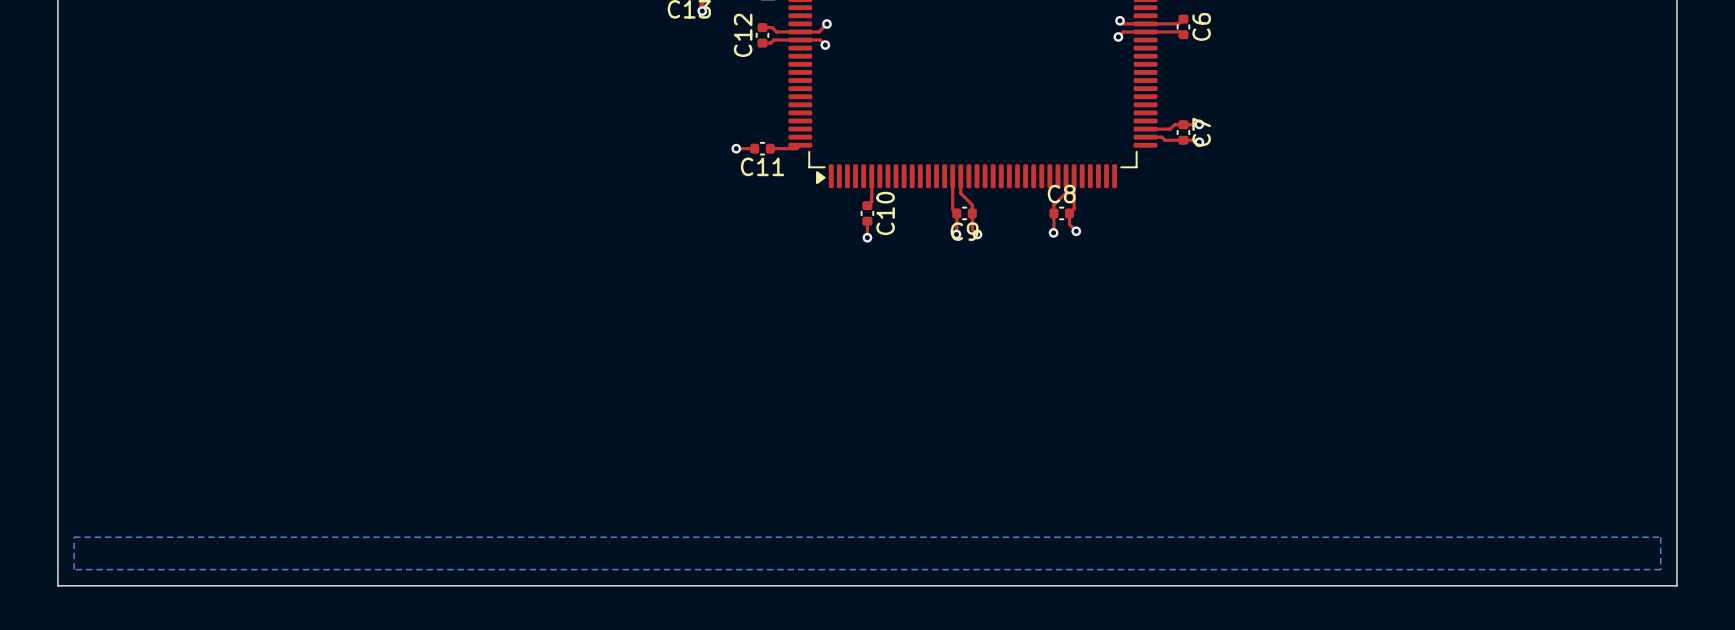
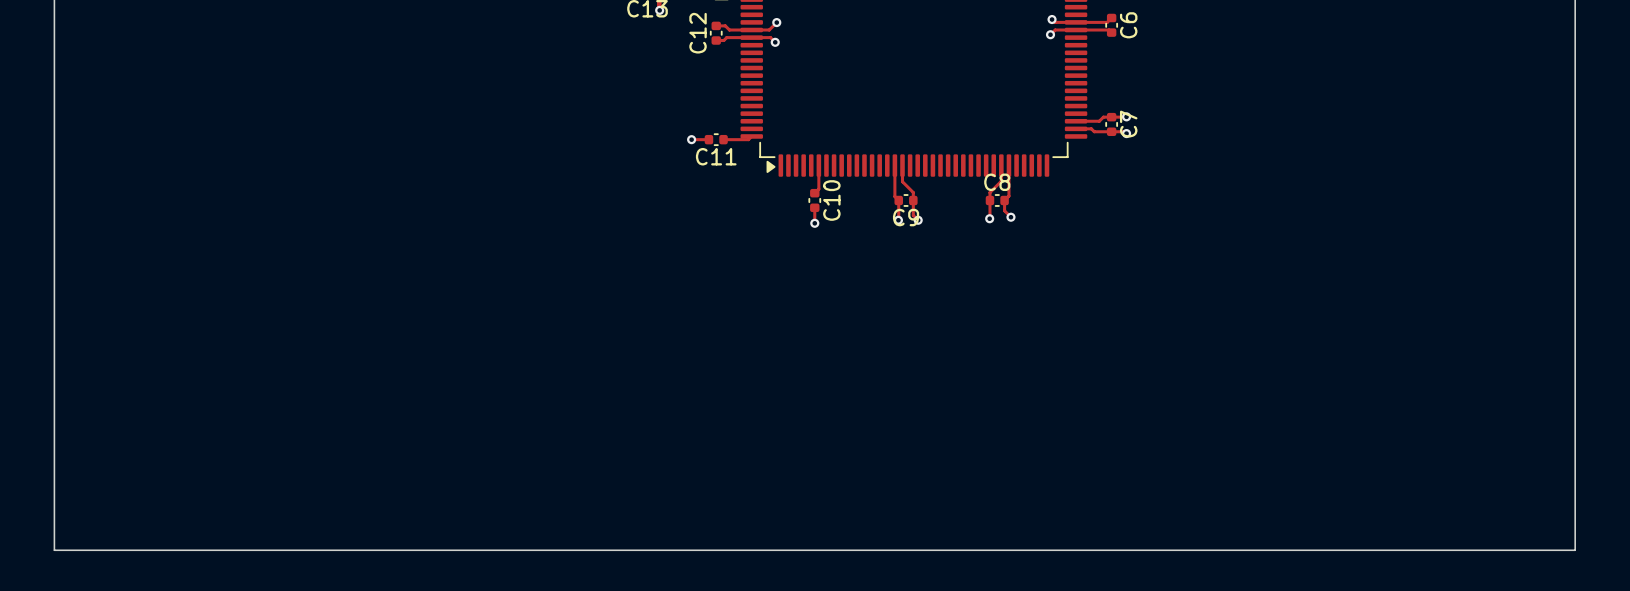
bottom zone outline: (74, 537) (1660, 537) (1660, 569) (74, 569) (74, 537) -> none

